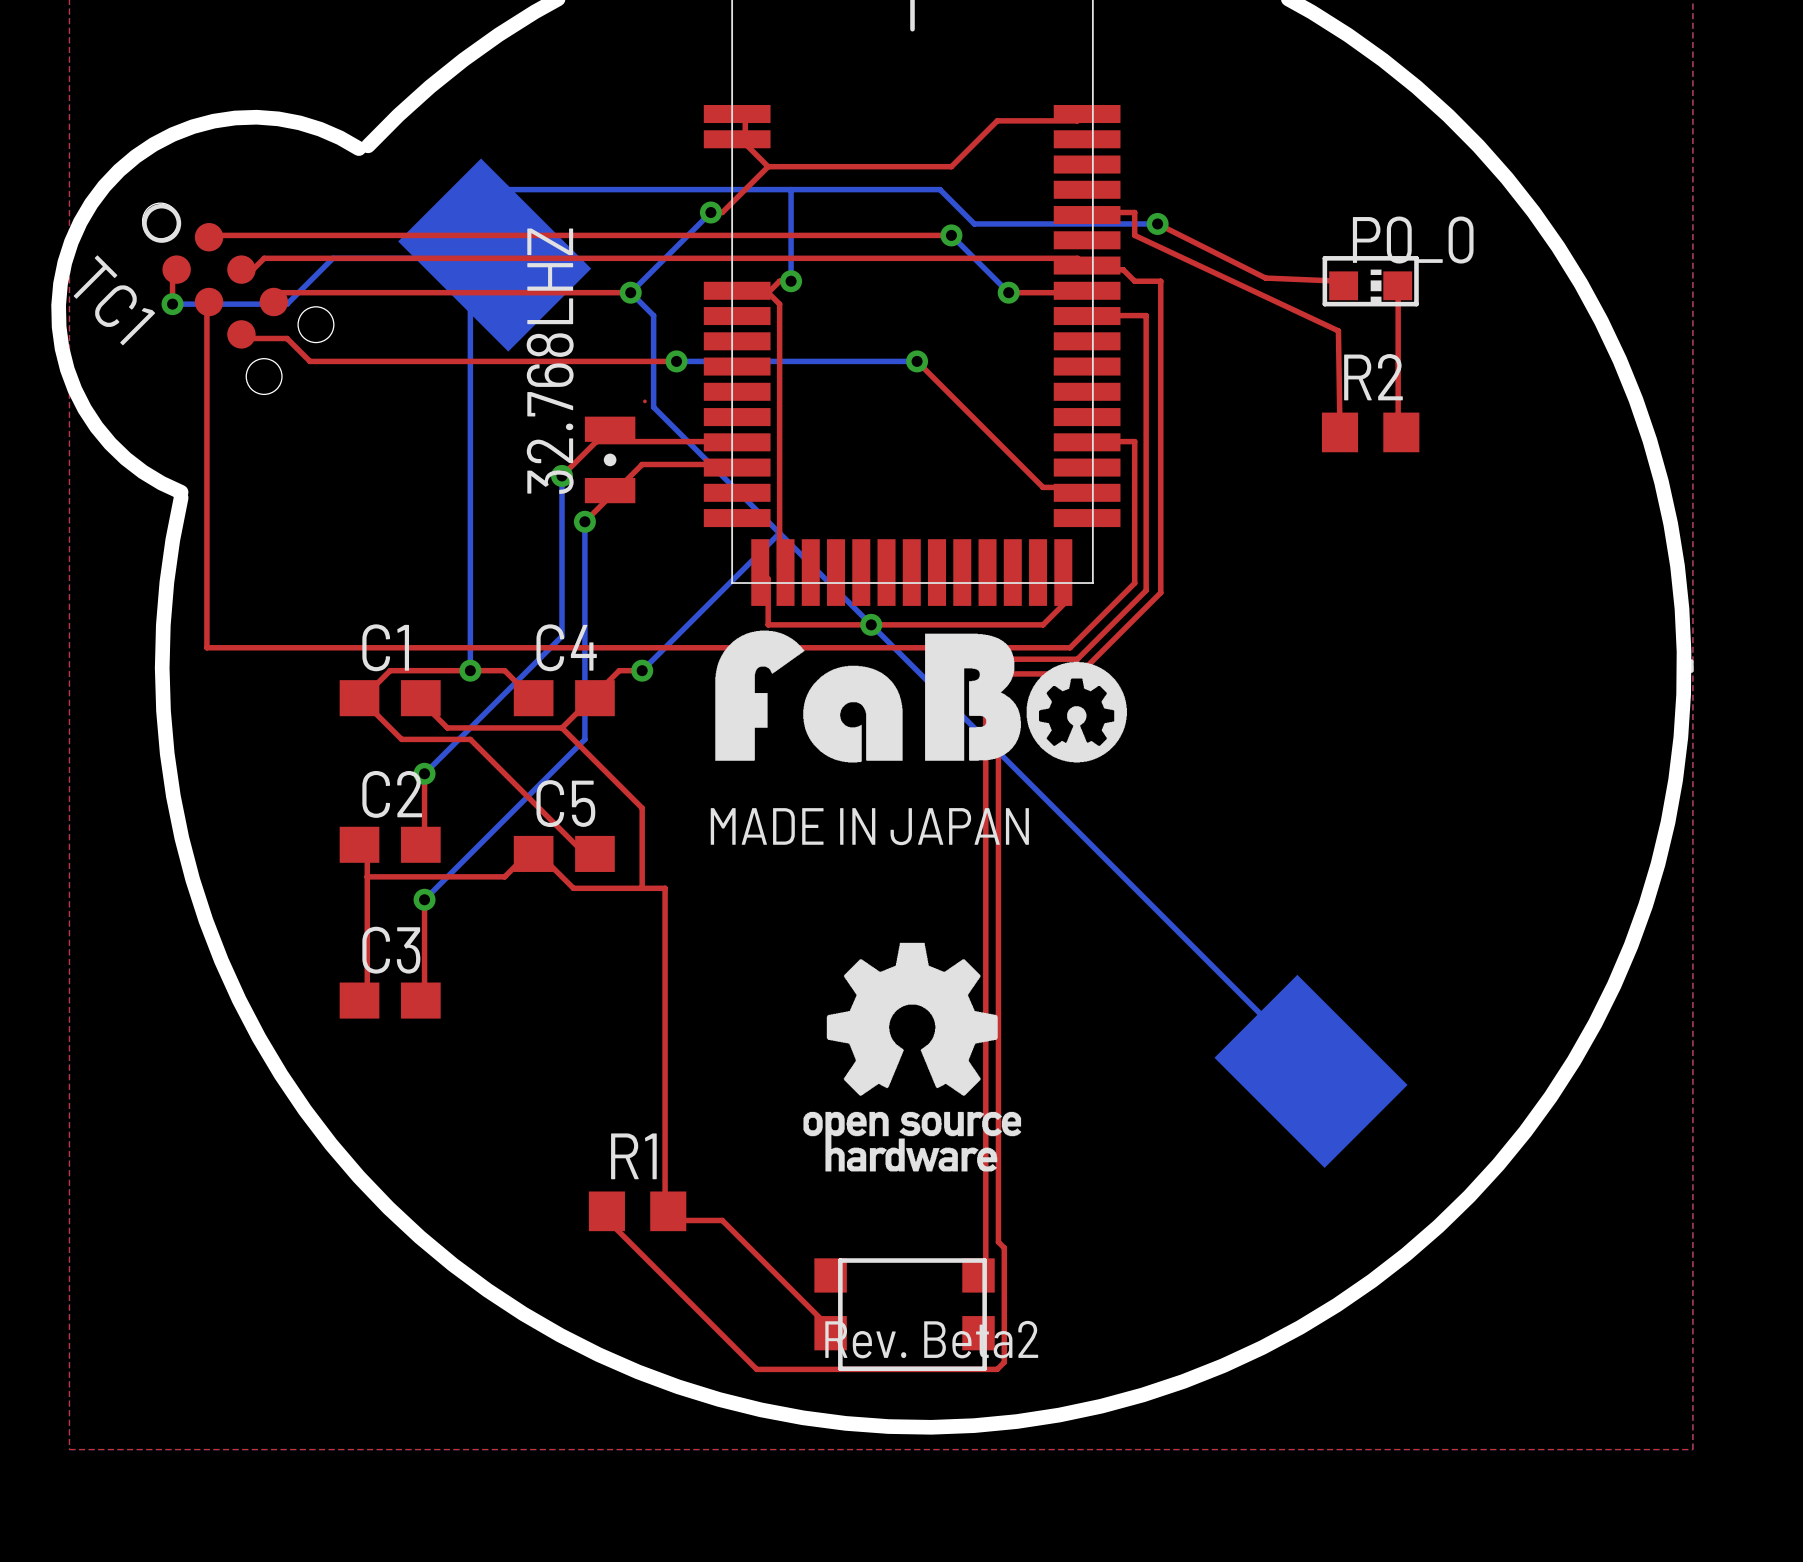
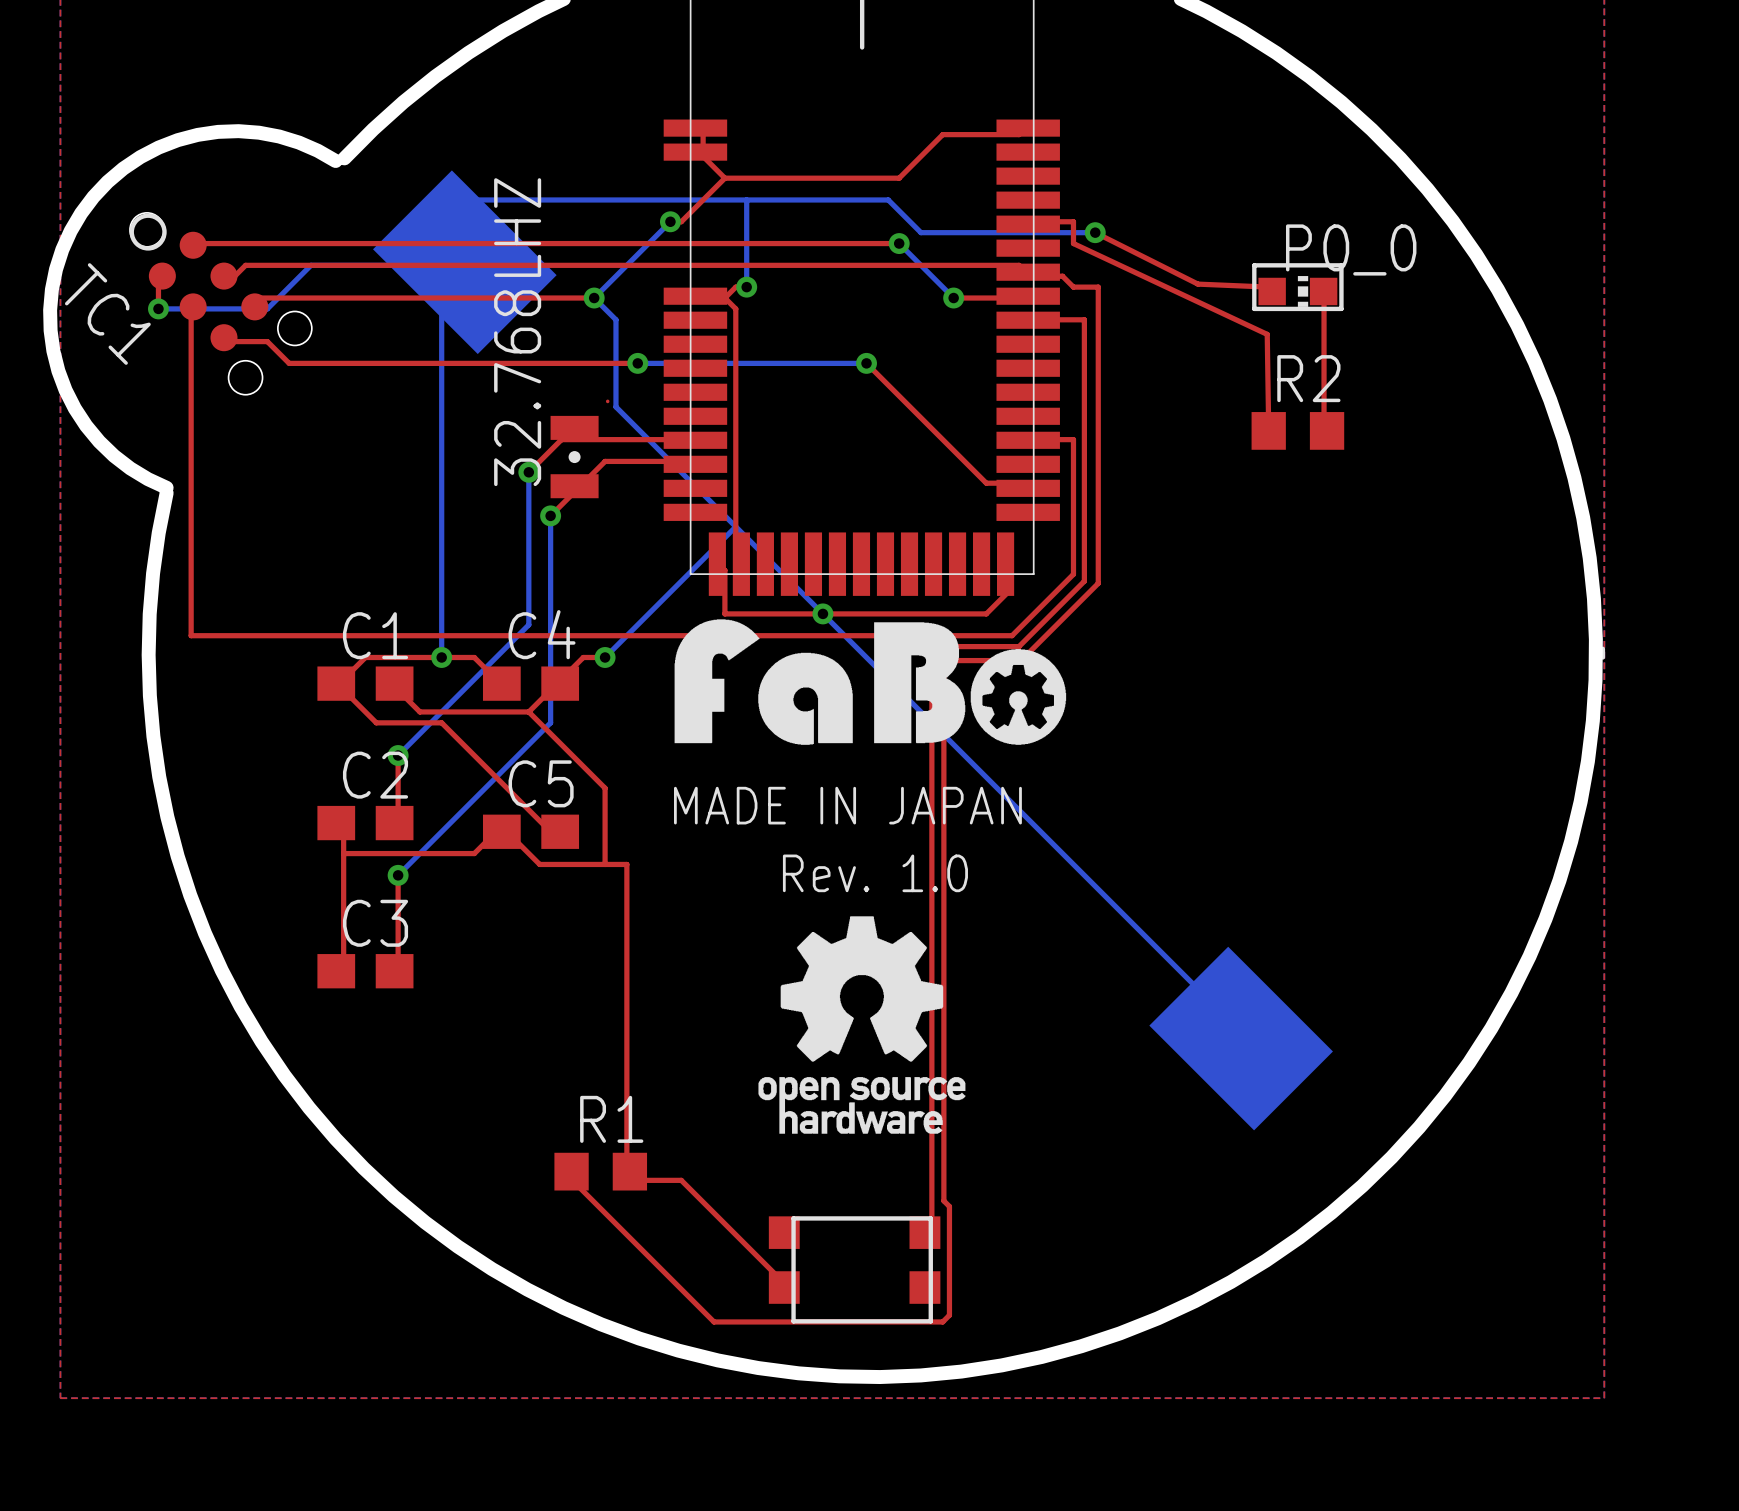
text: none -> Rev. 1.0 (875, 873)
text: Rev. Beta2 (931, 1339) -> none

